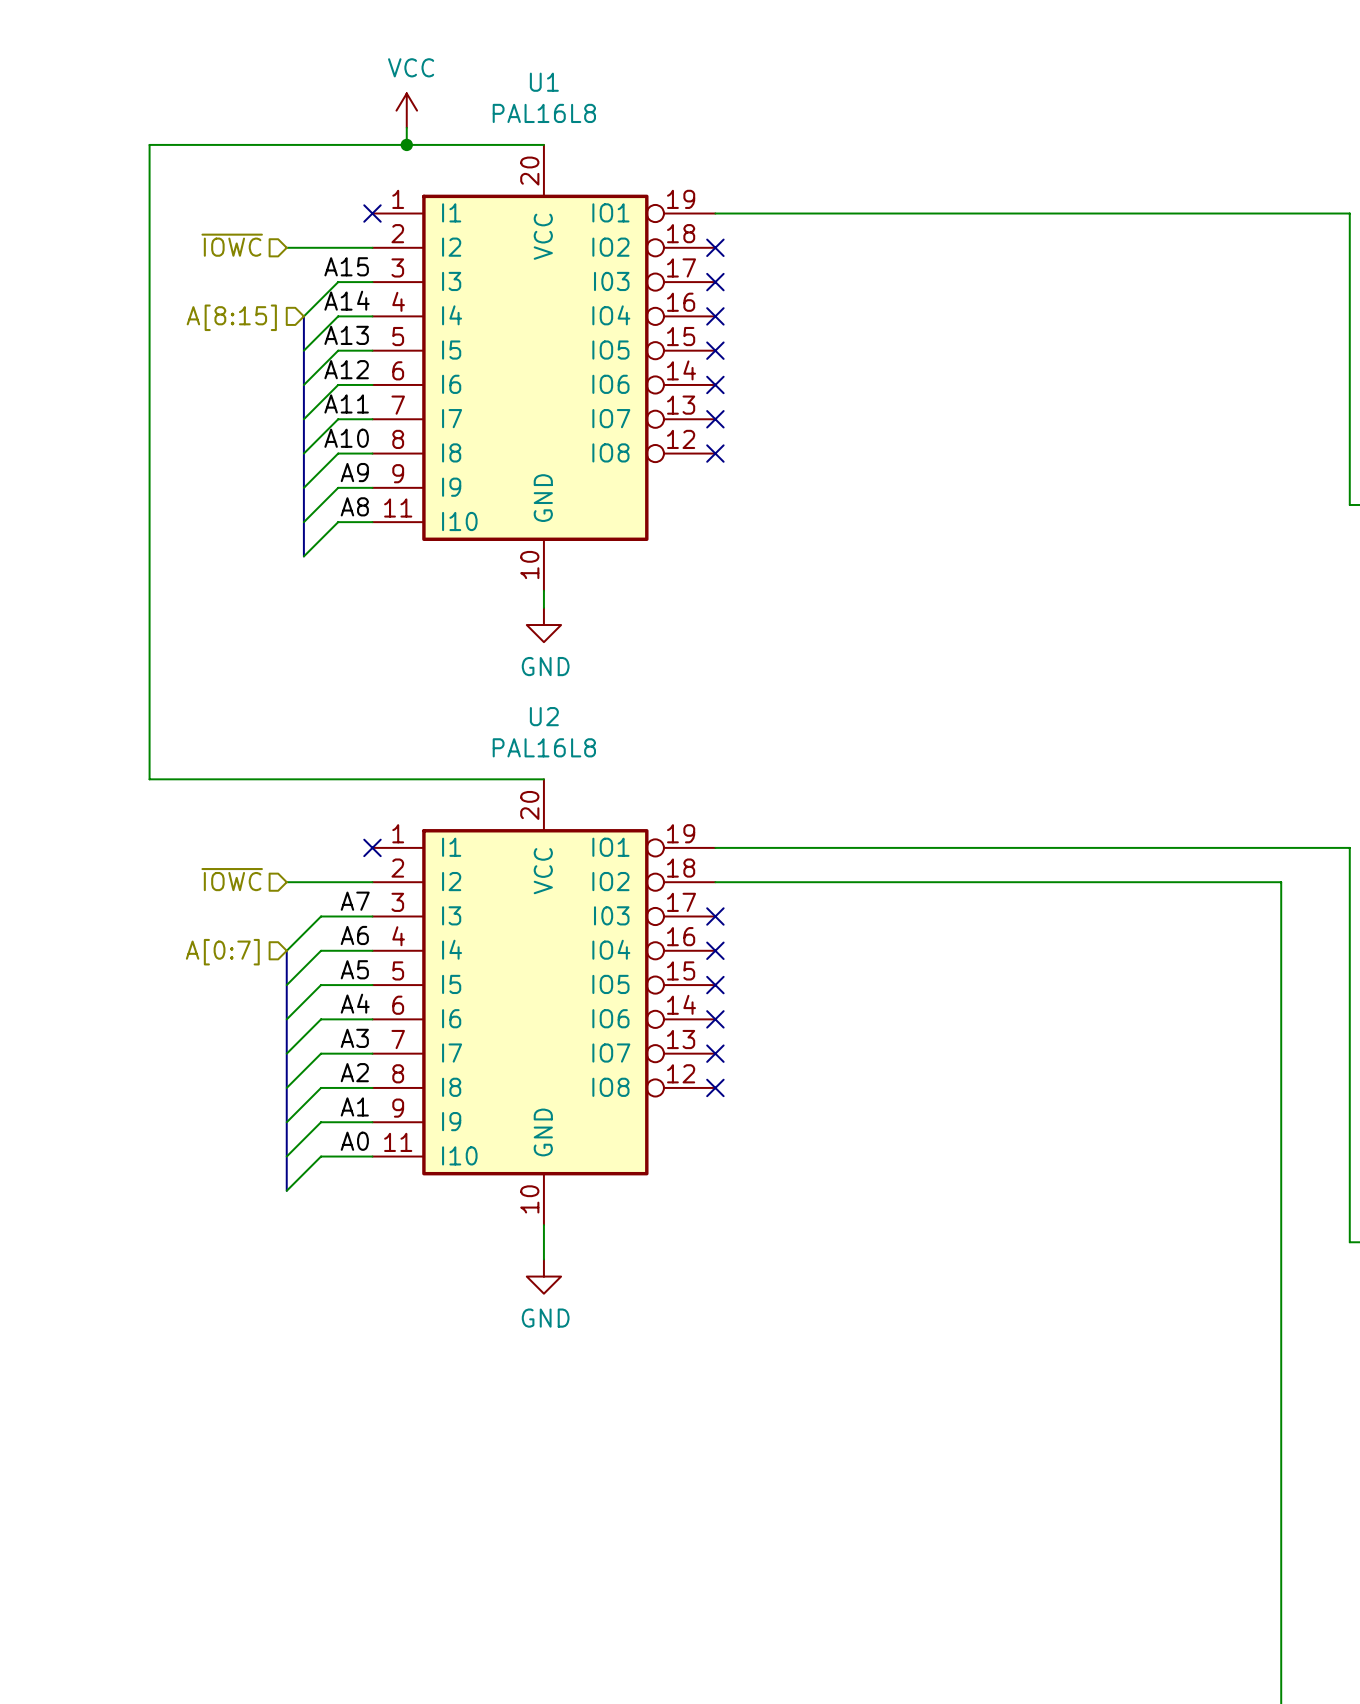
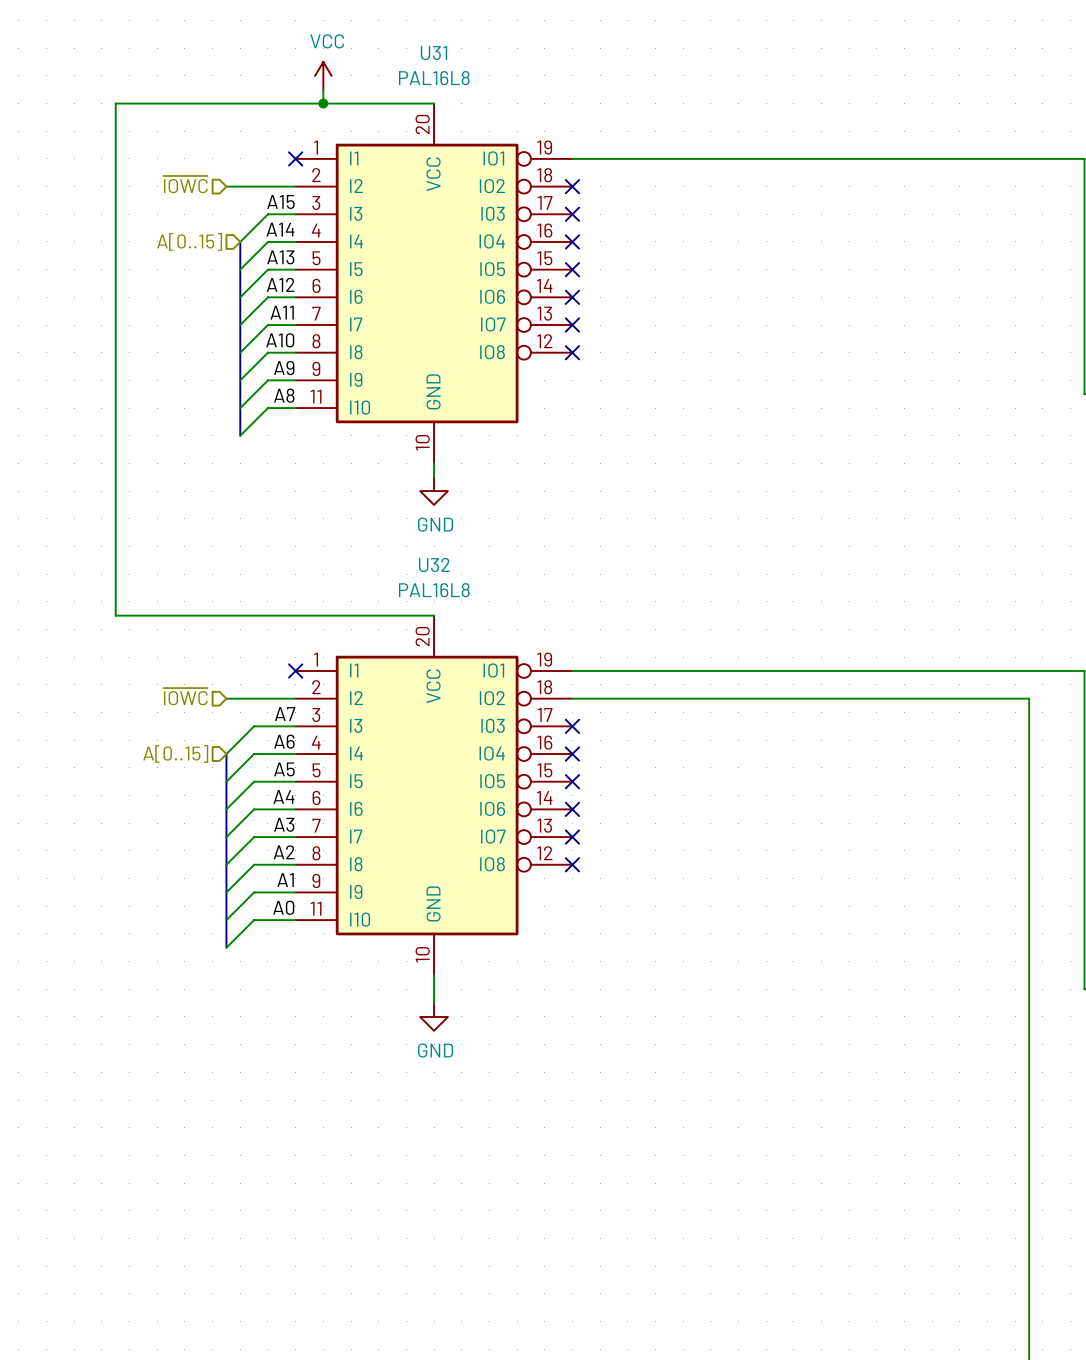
U1 name: U1 (544, 82) -> U31 (433, 53)
hierarchical label: A[8:15] (231, 317) -> A[0..15] (189, 241)
U2 name: U2 (544, 716) -> U32 (434, 565)
hierarchical label: A[0:7] (222, 952) -> A[0..15] (175, 753)

